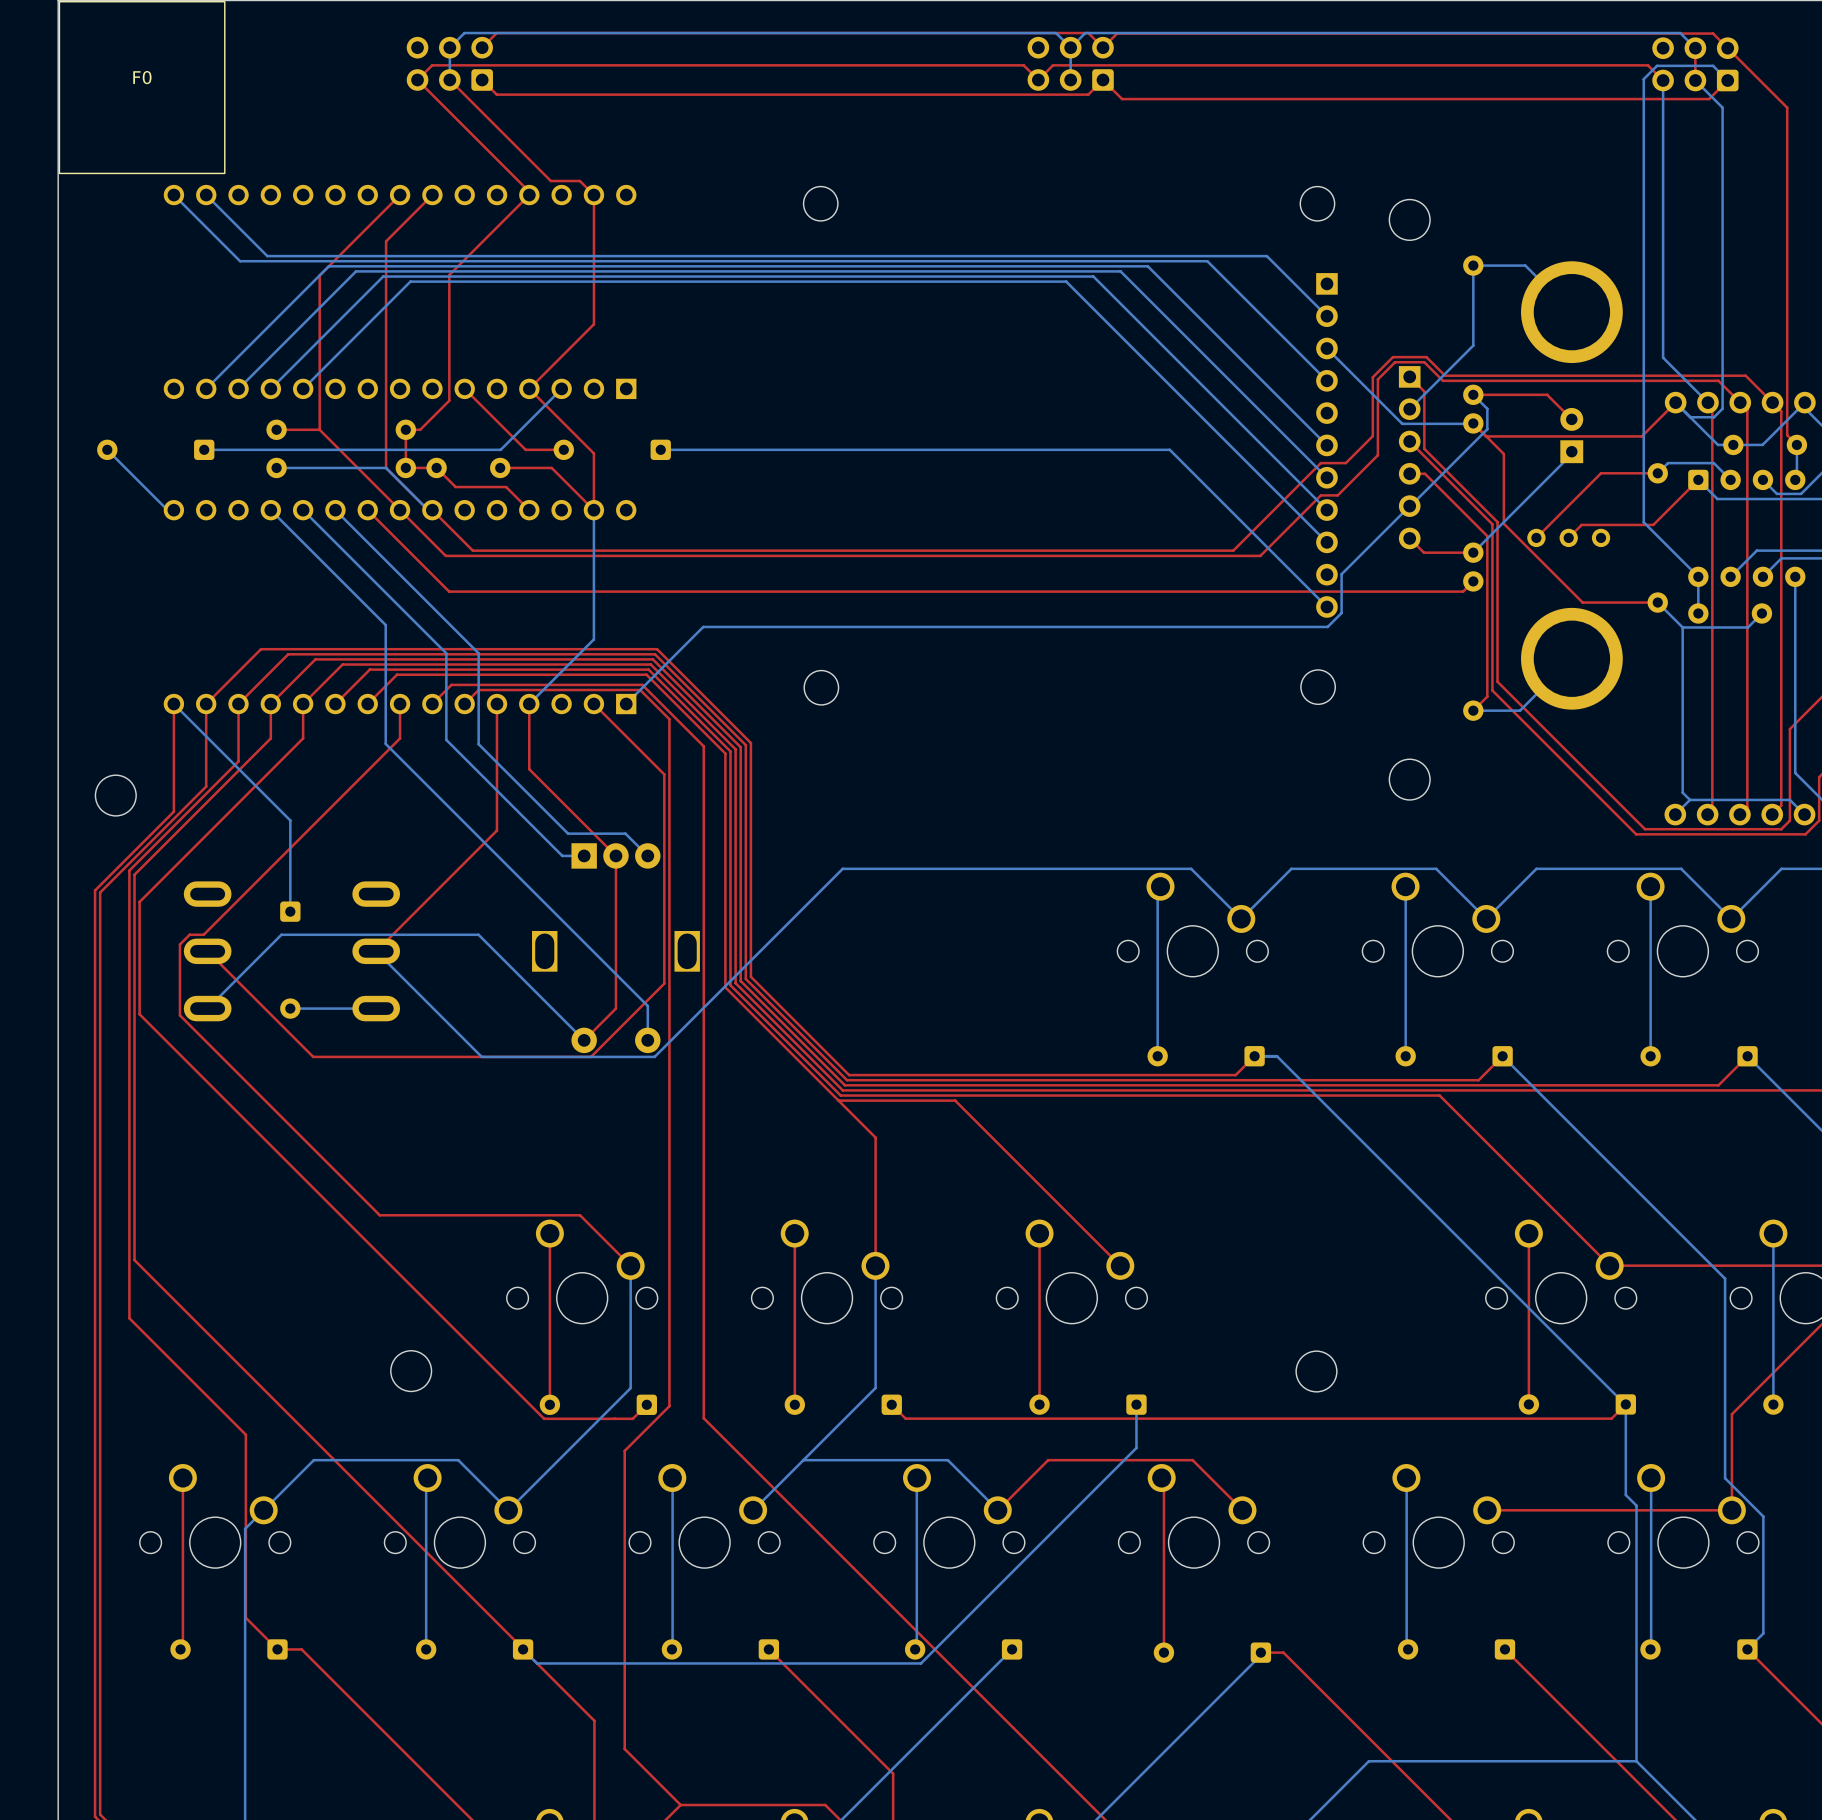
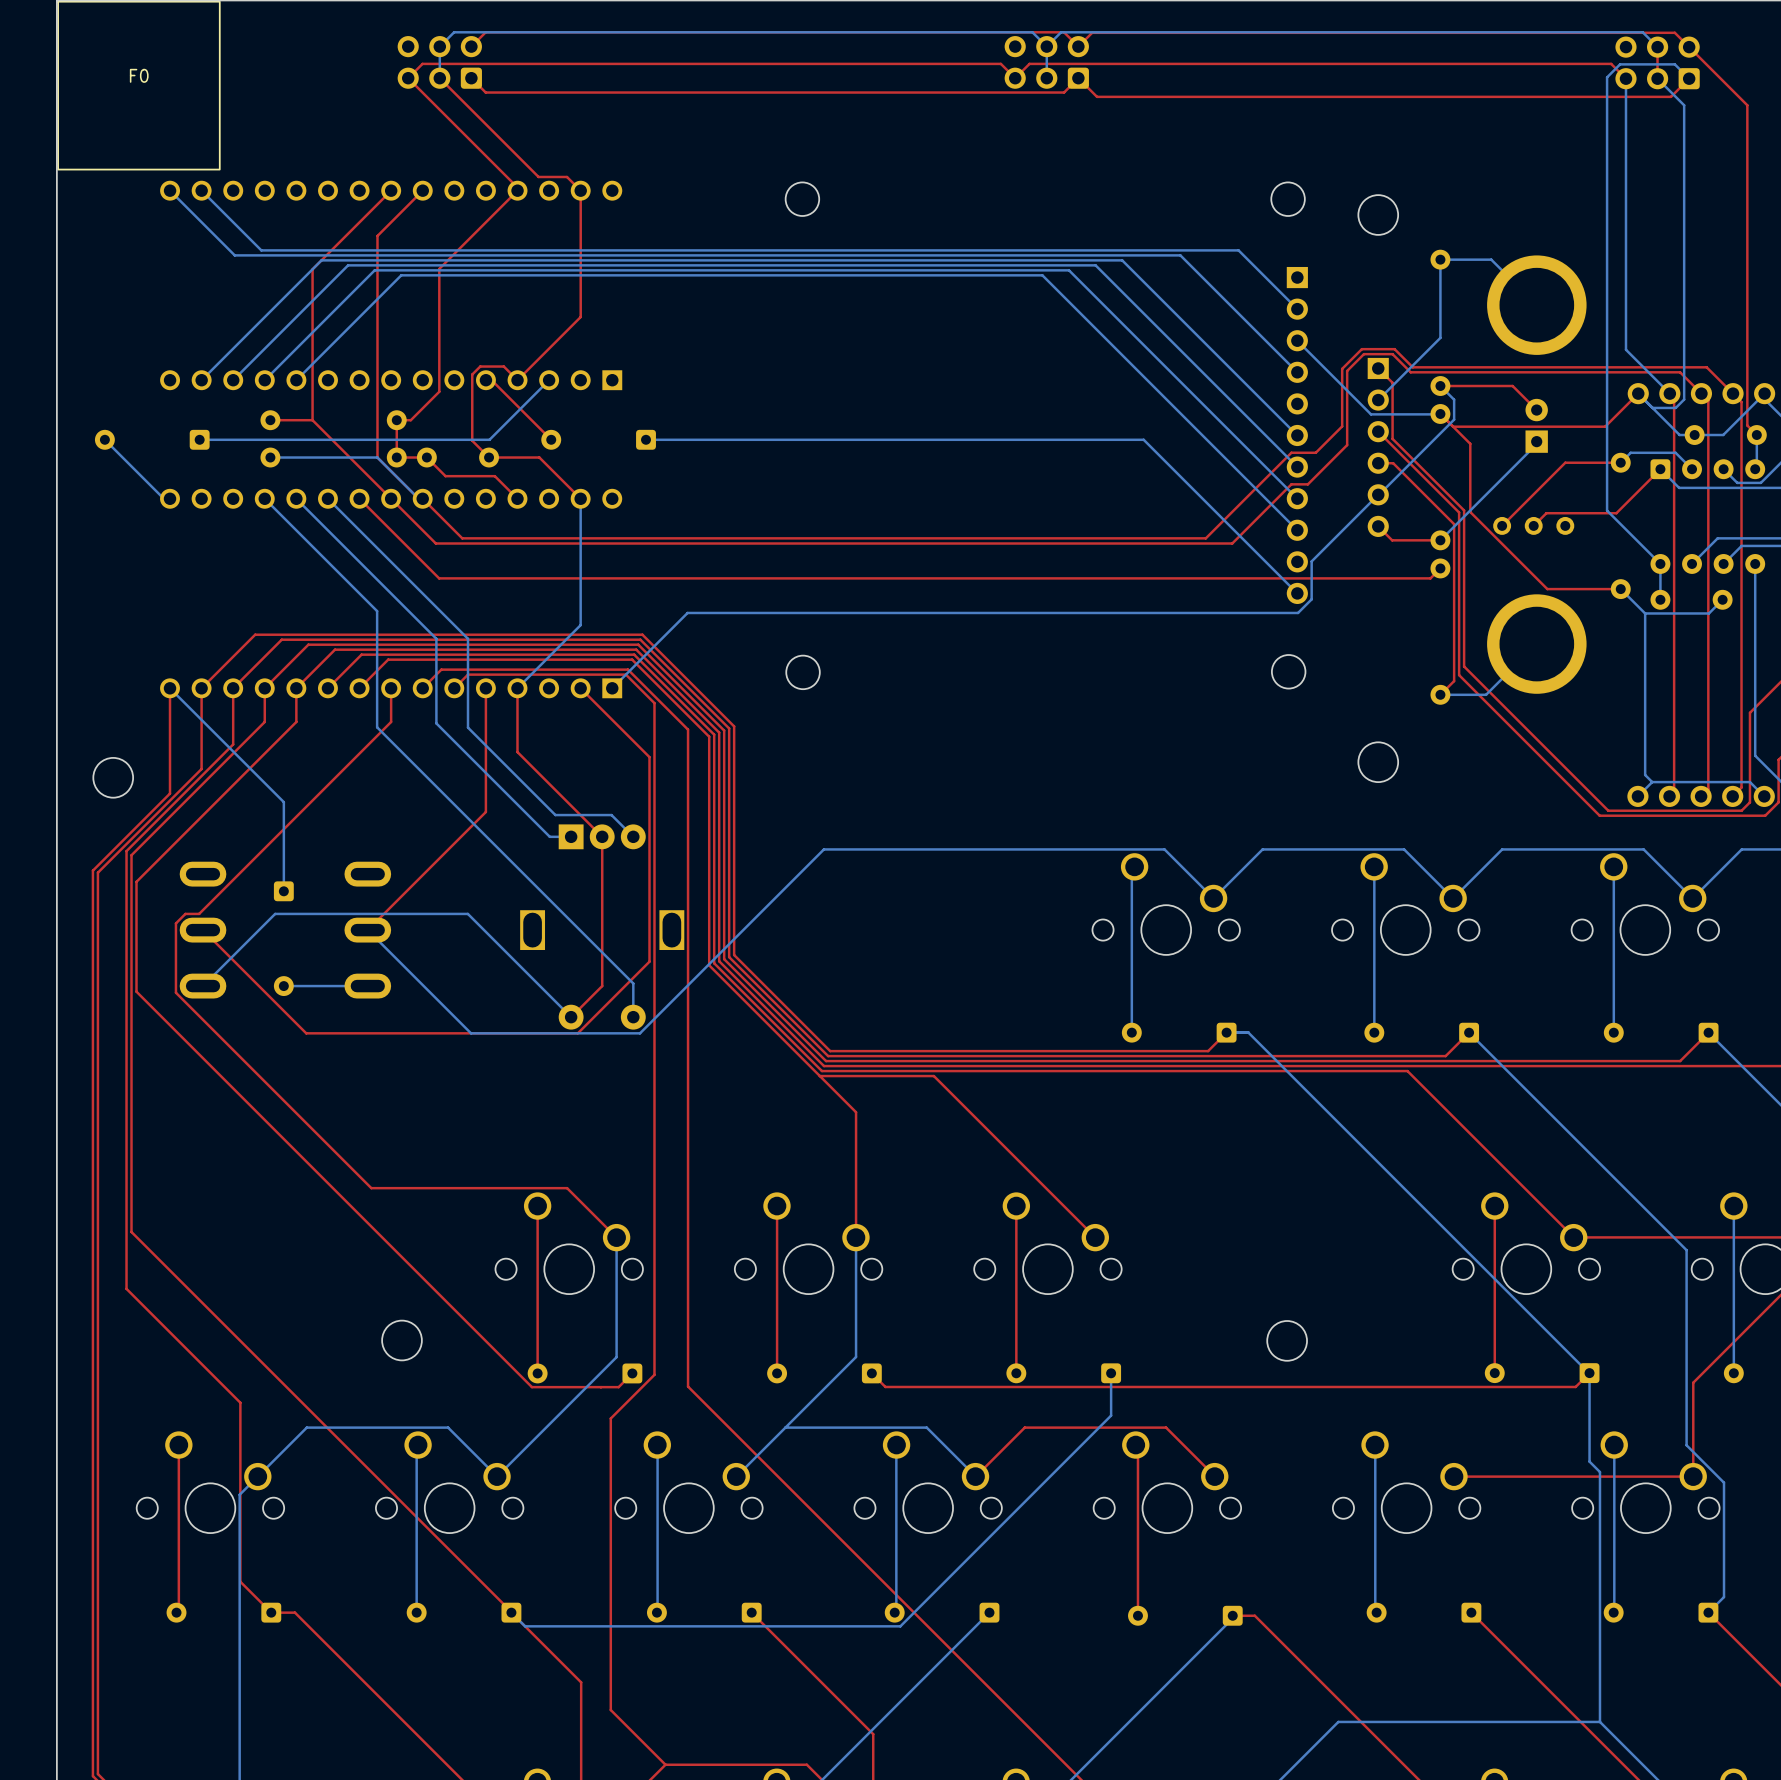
top track: (464, 388) (525, 449) (563, 449) -> (485, 380) (491, 380) (551, 439)
top track: (529, 388) (593, 453) (593, 510) -> (517, 380) (503, 366) (480, 366) (472, 374) (472, 440) (489, 457)

